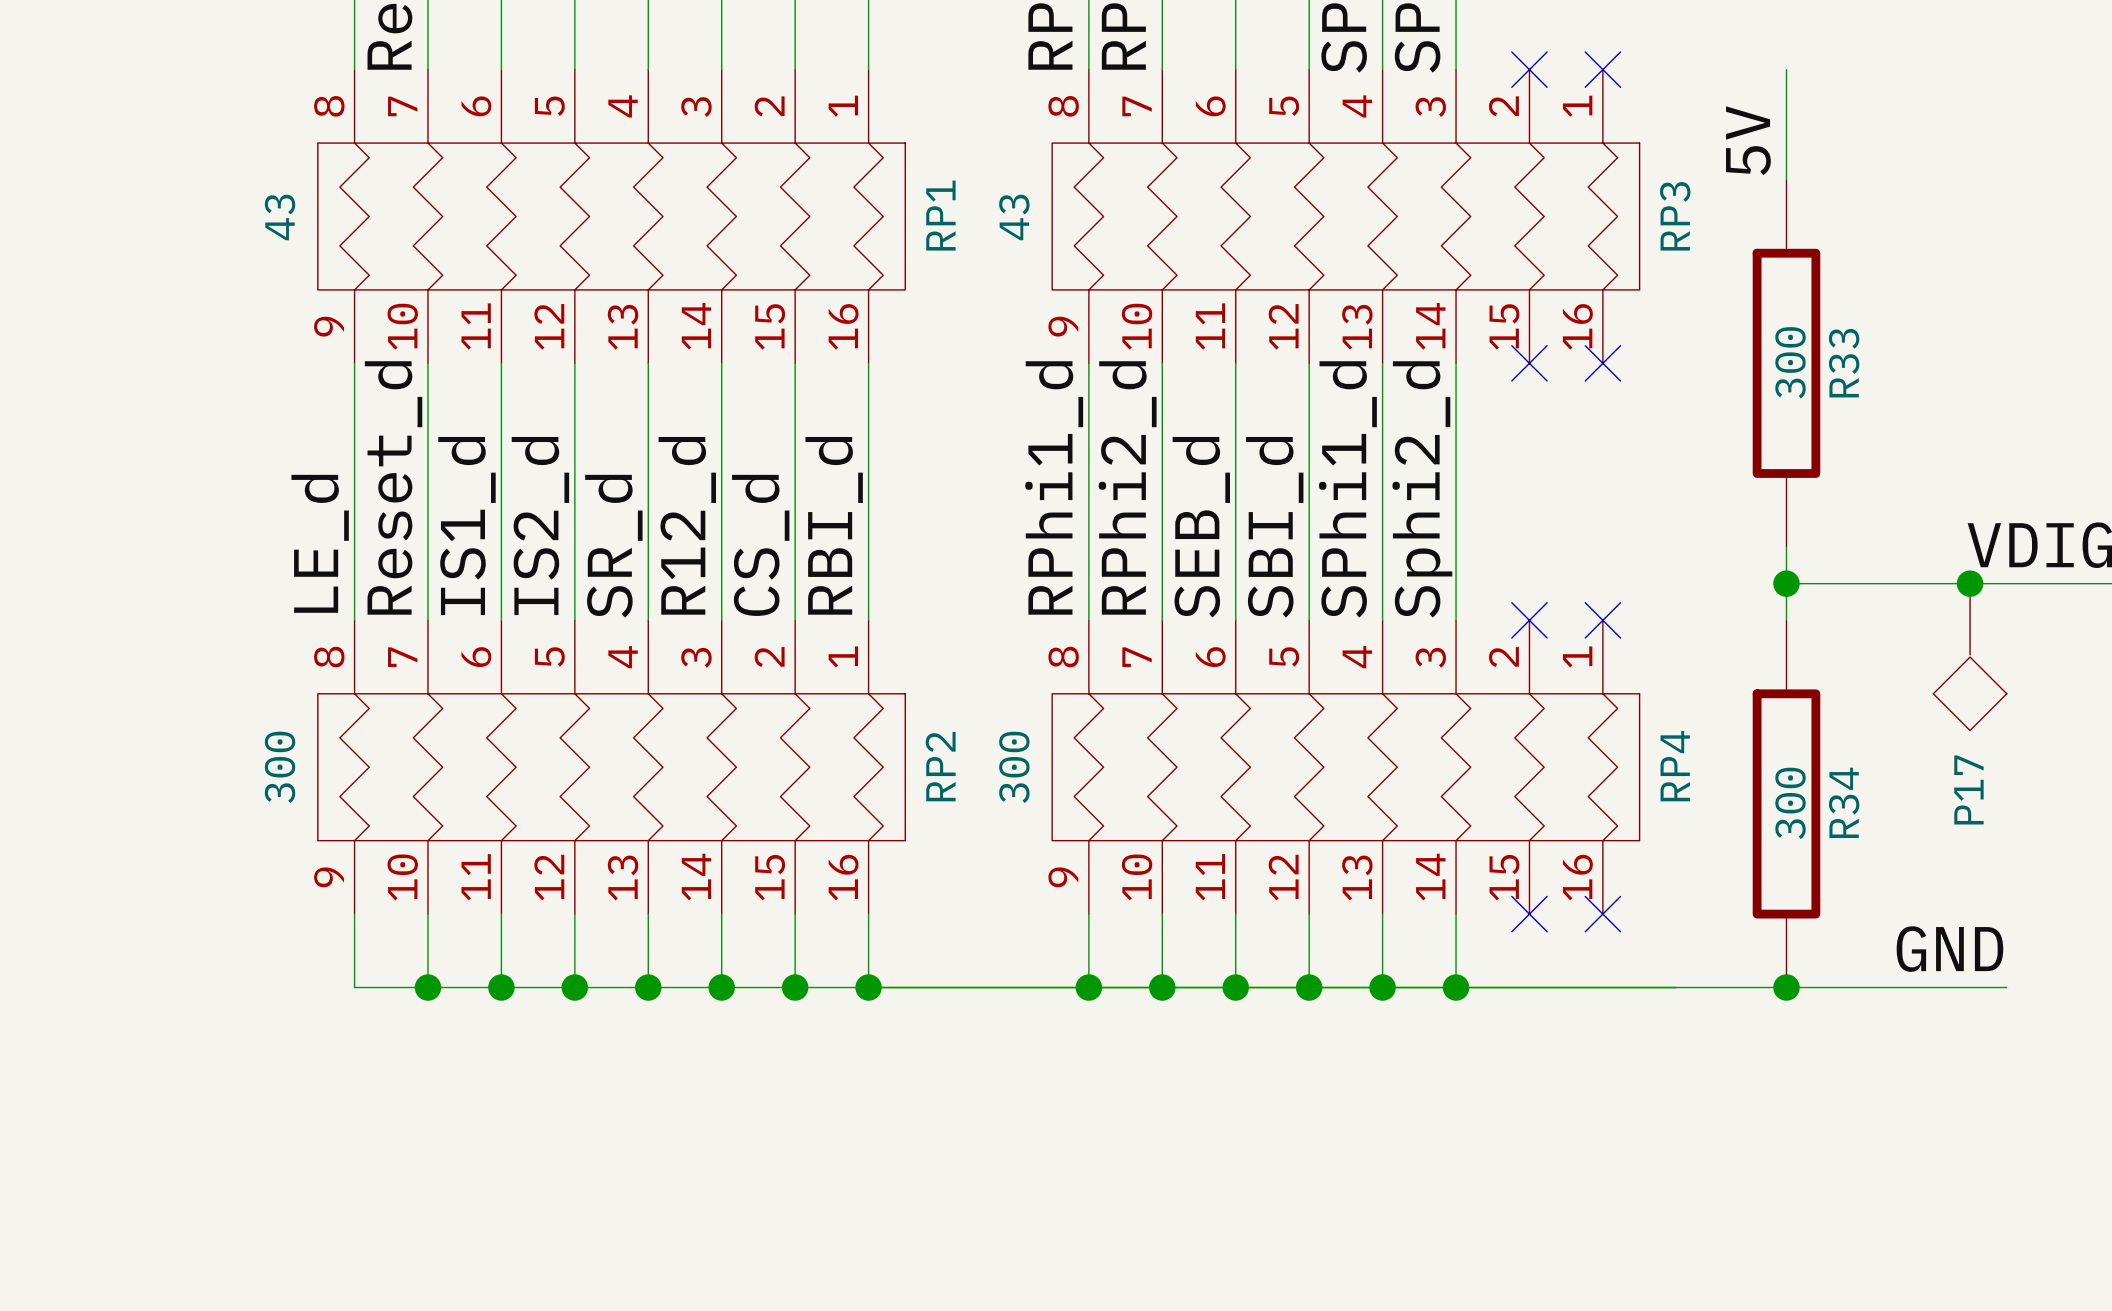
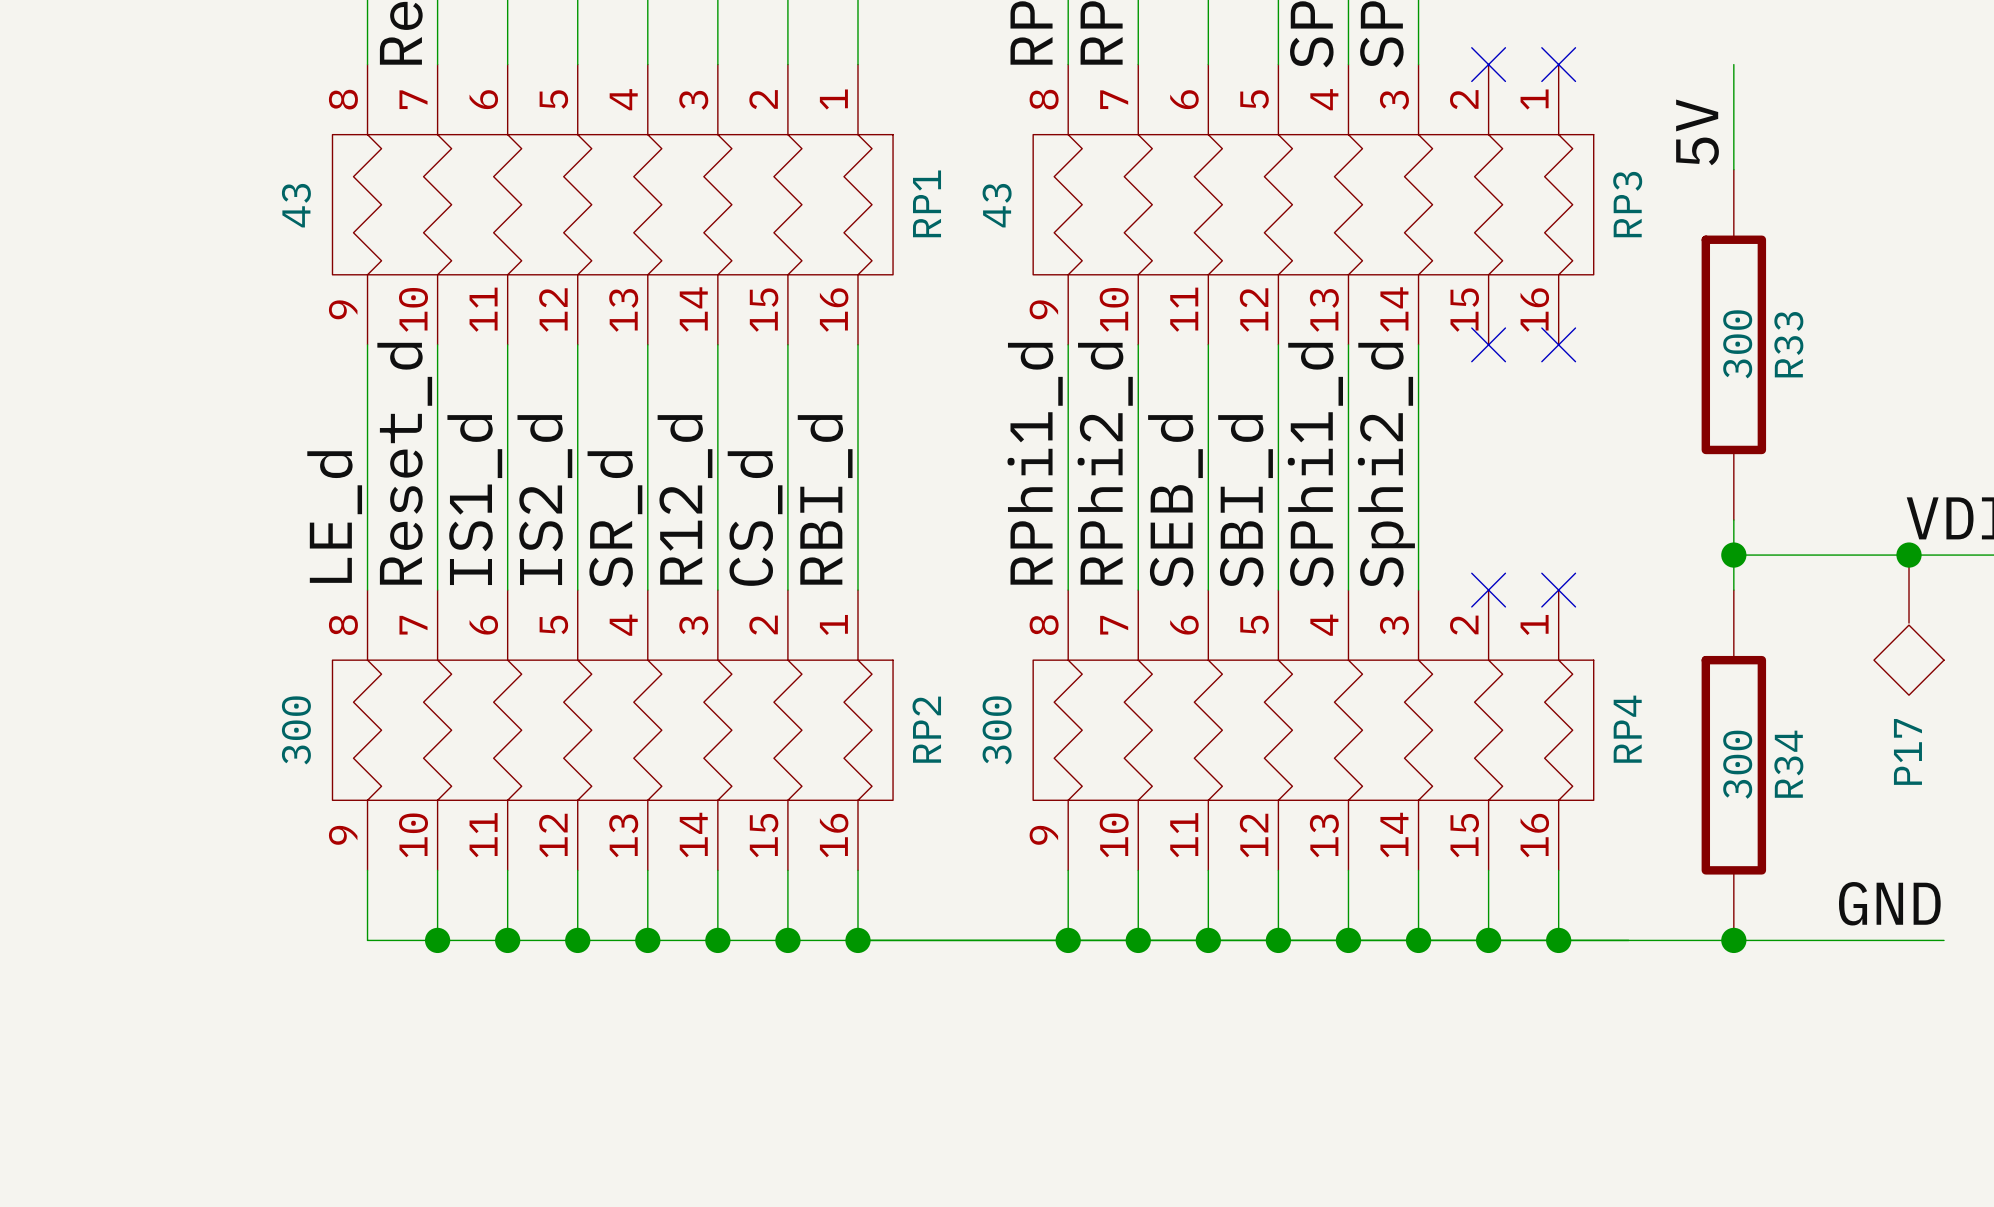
wire: none -> (1488, 870) (1488, 940)
no-connect mark: (1529, 914) -> none
wire: none -> (1558, 870) (1558, 940)
no-connect mark: (1602, 914) -> none
junction: none -> (1488, 940)
junction: none -> (1558, 940)

